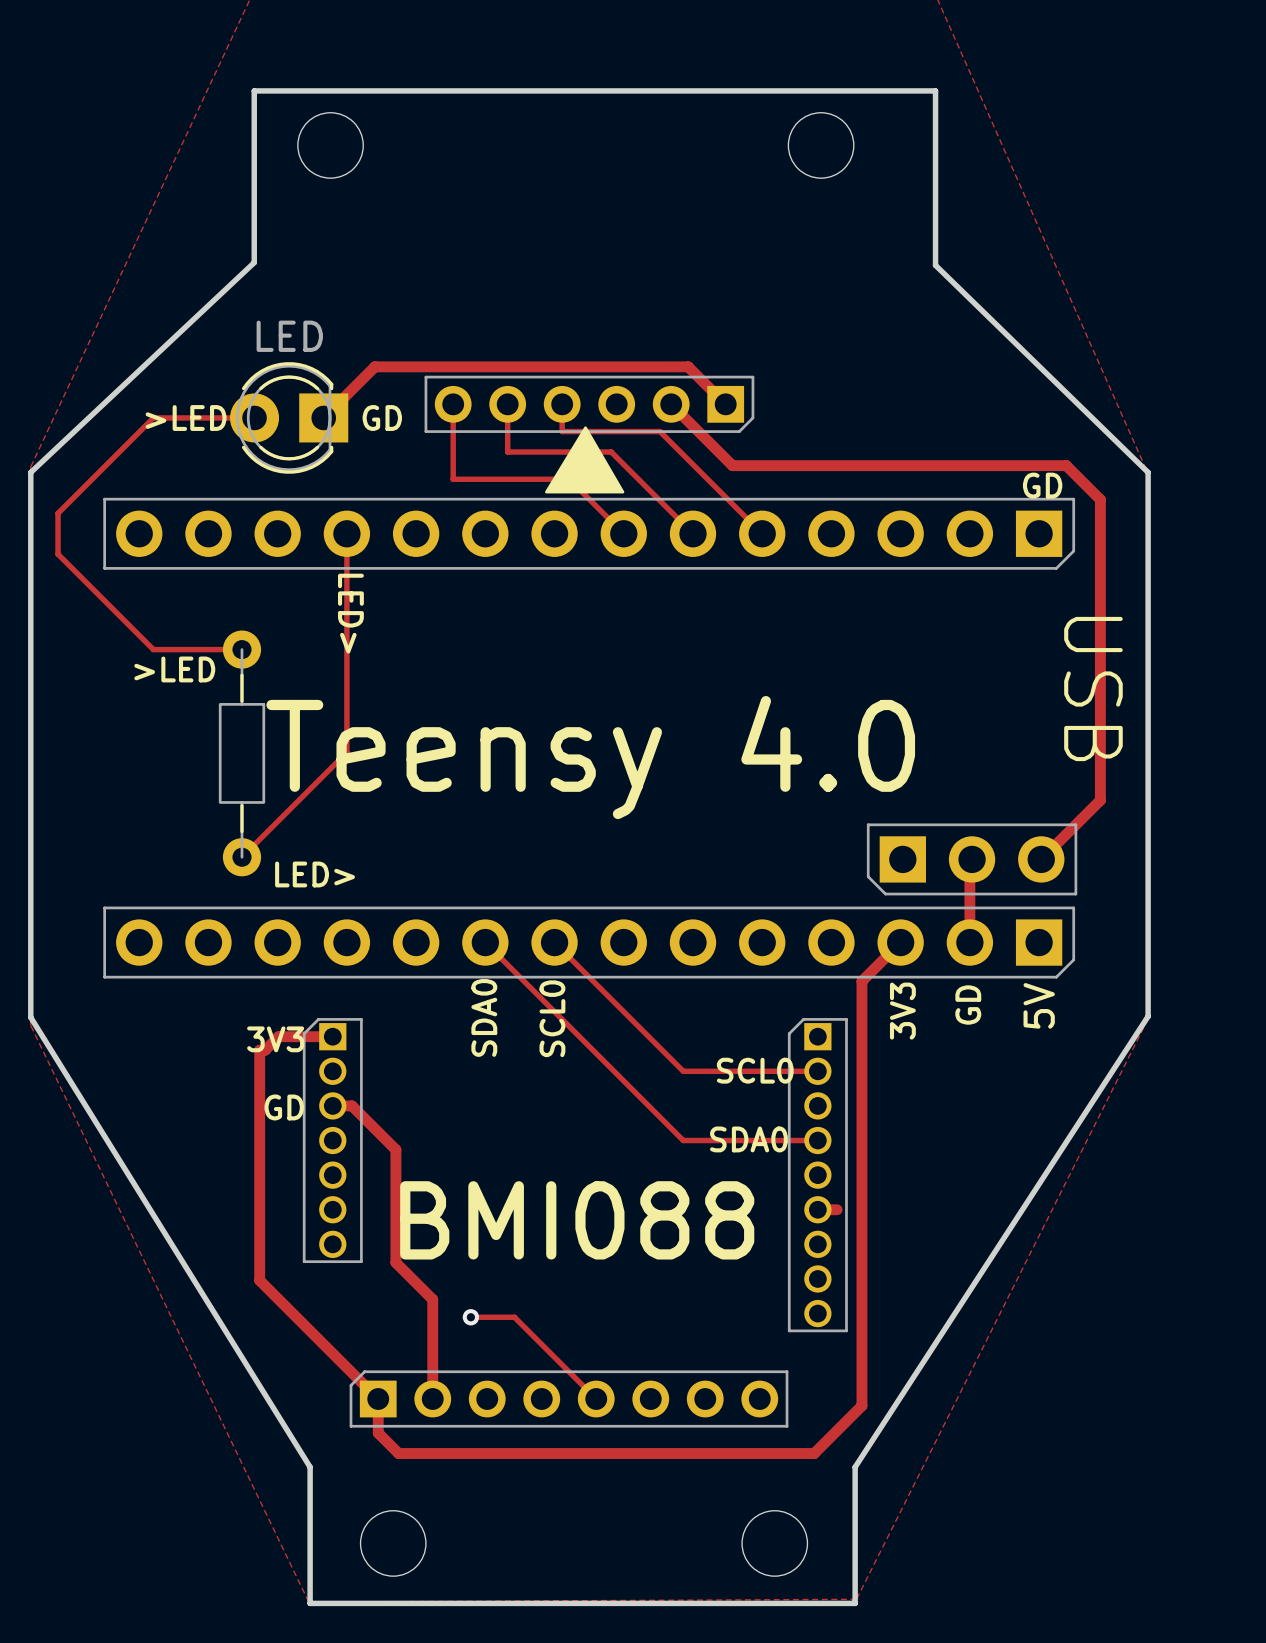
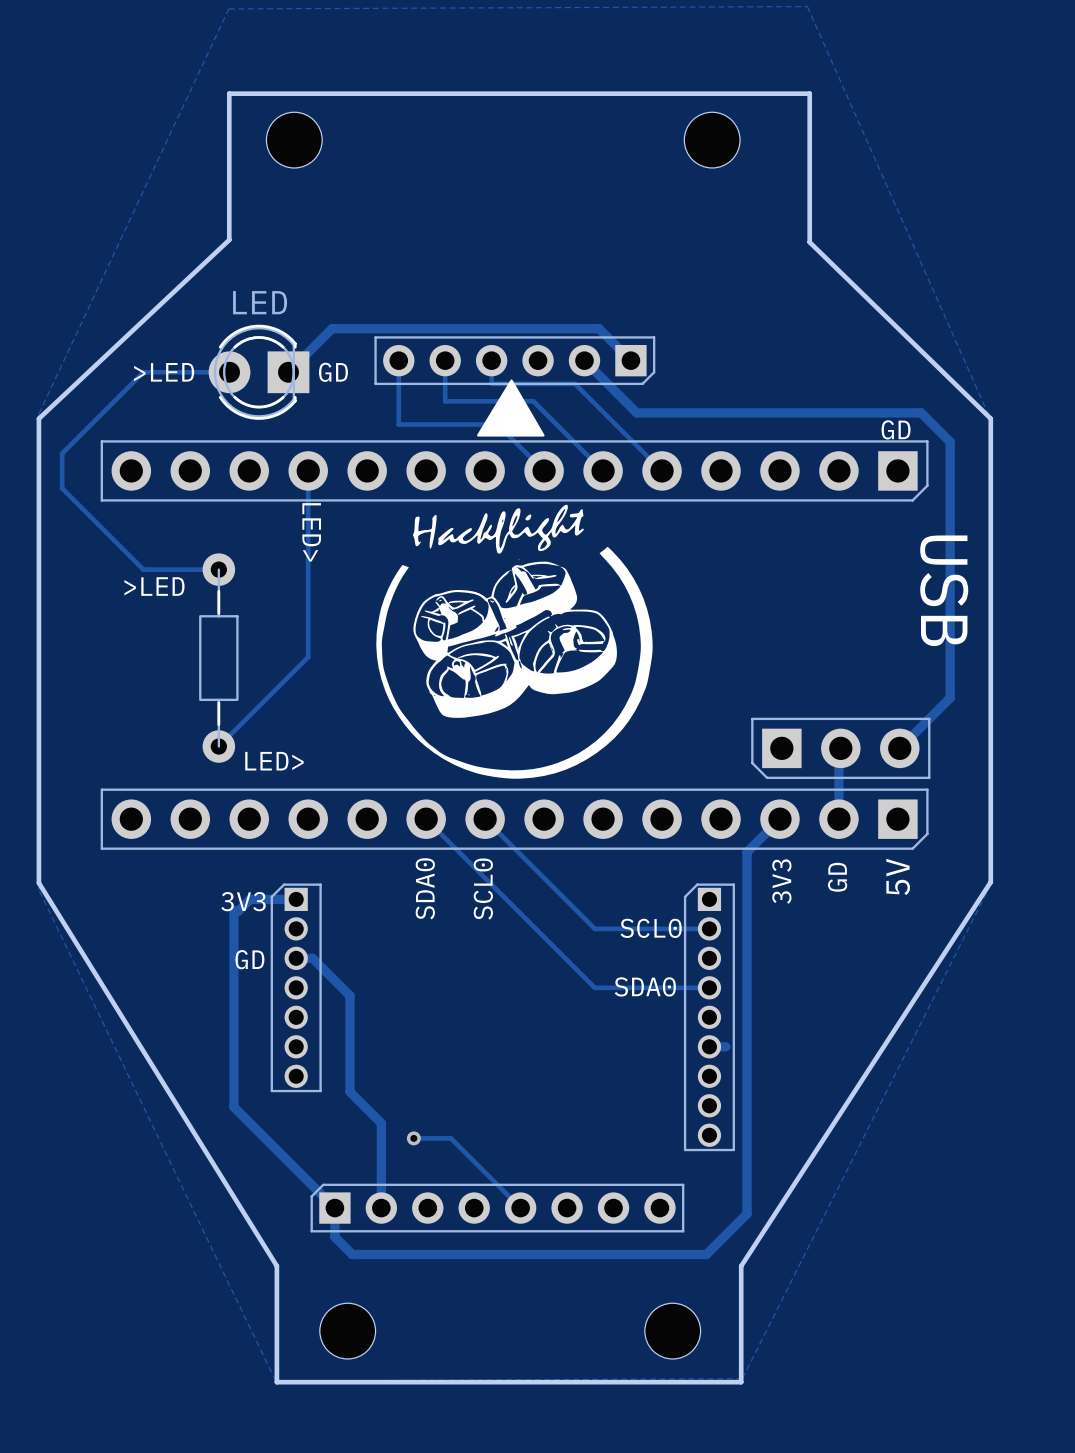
drawing: none -> [376, 504, 653, 779]
text: Teensy 4.0 (590, 757) -> none
text: BMI088 (577, 1220) -> none

